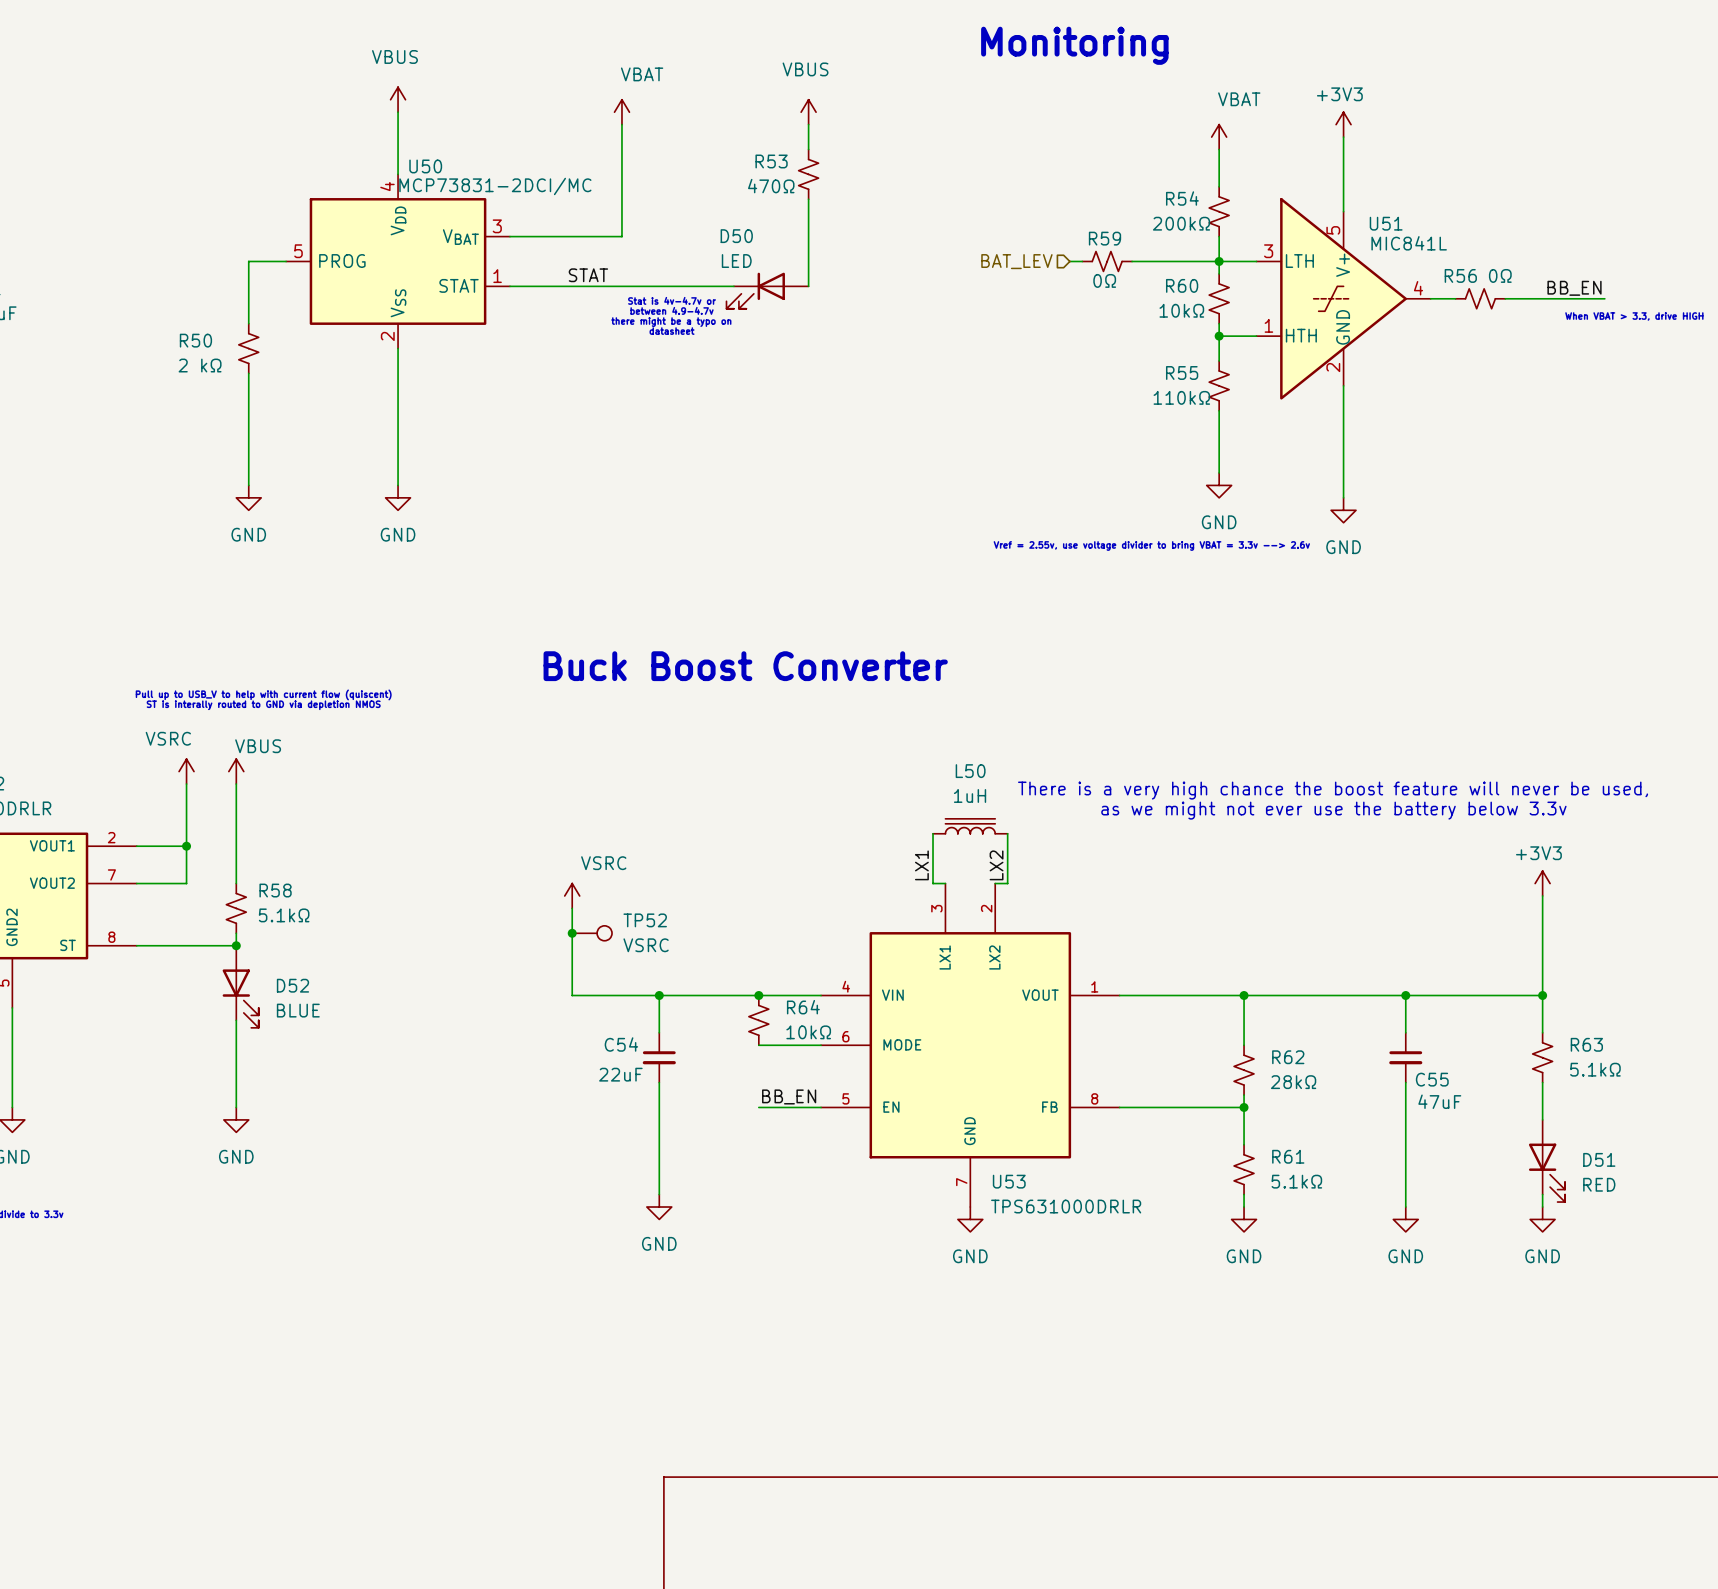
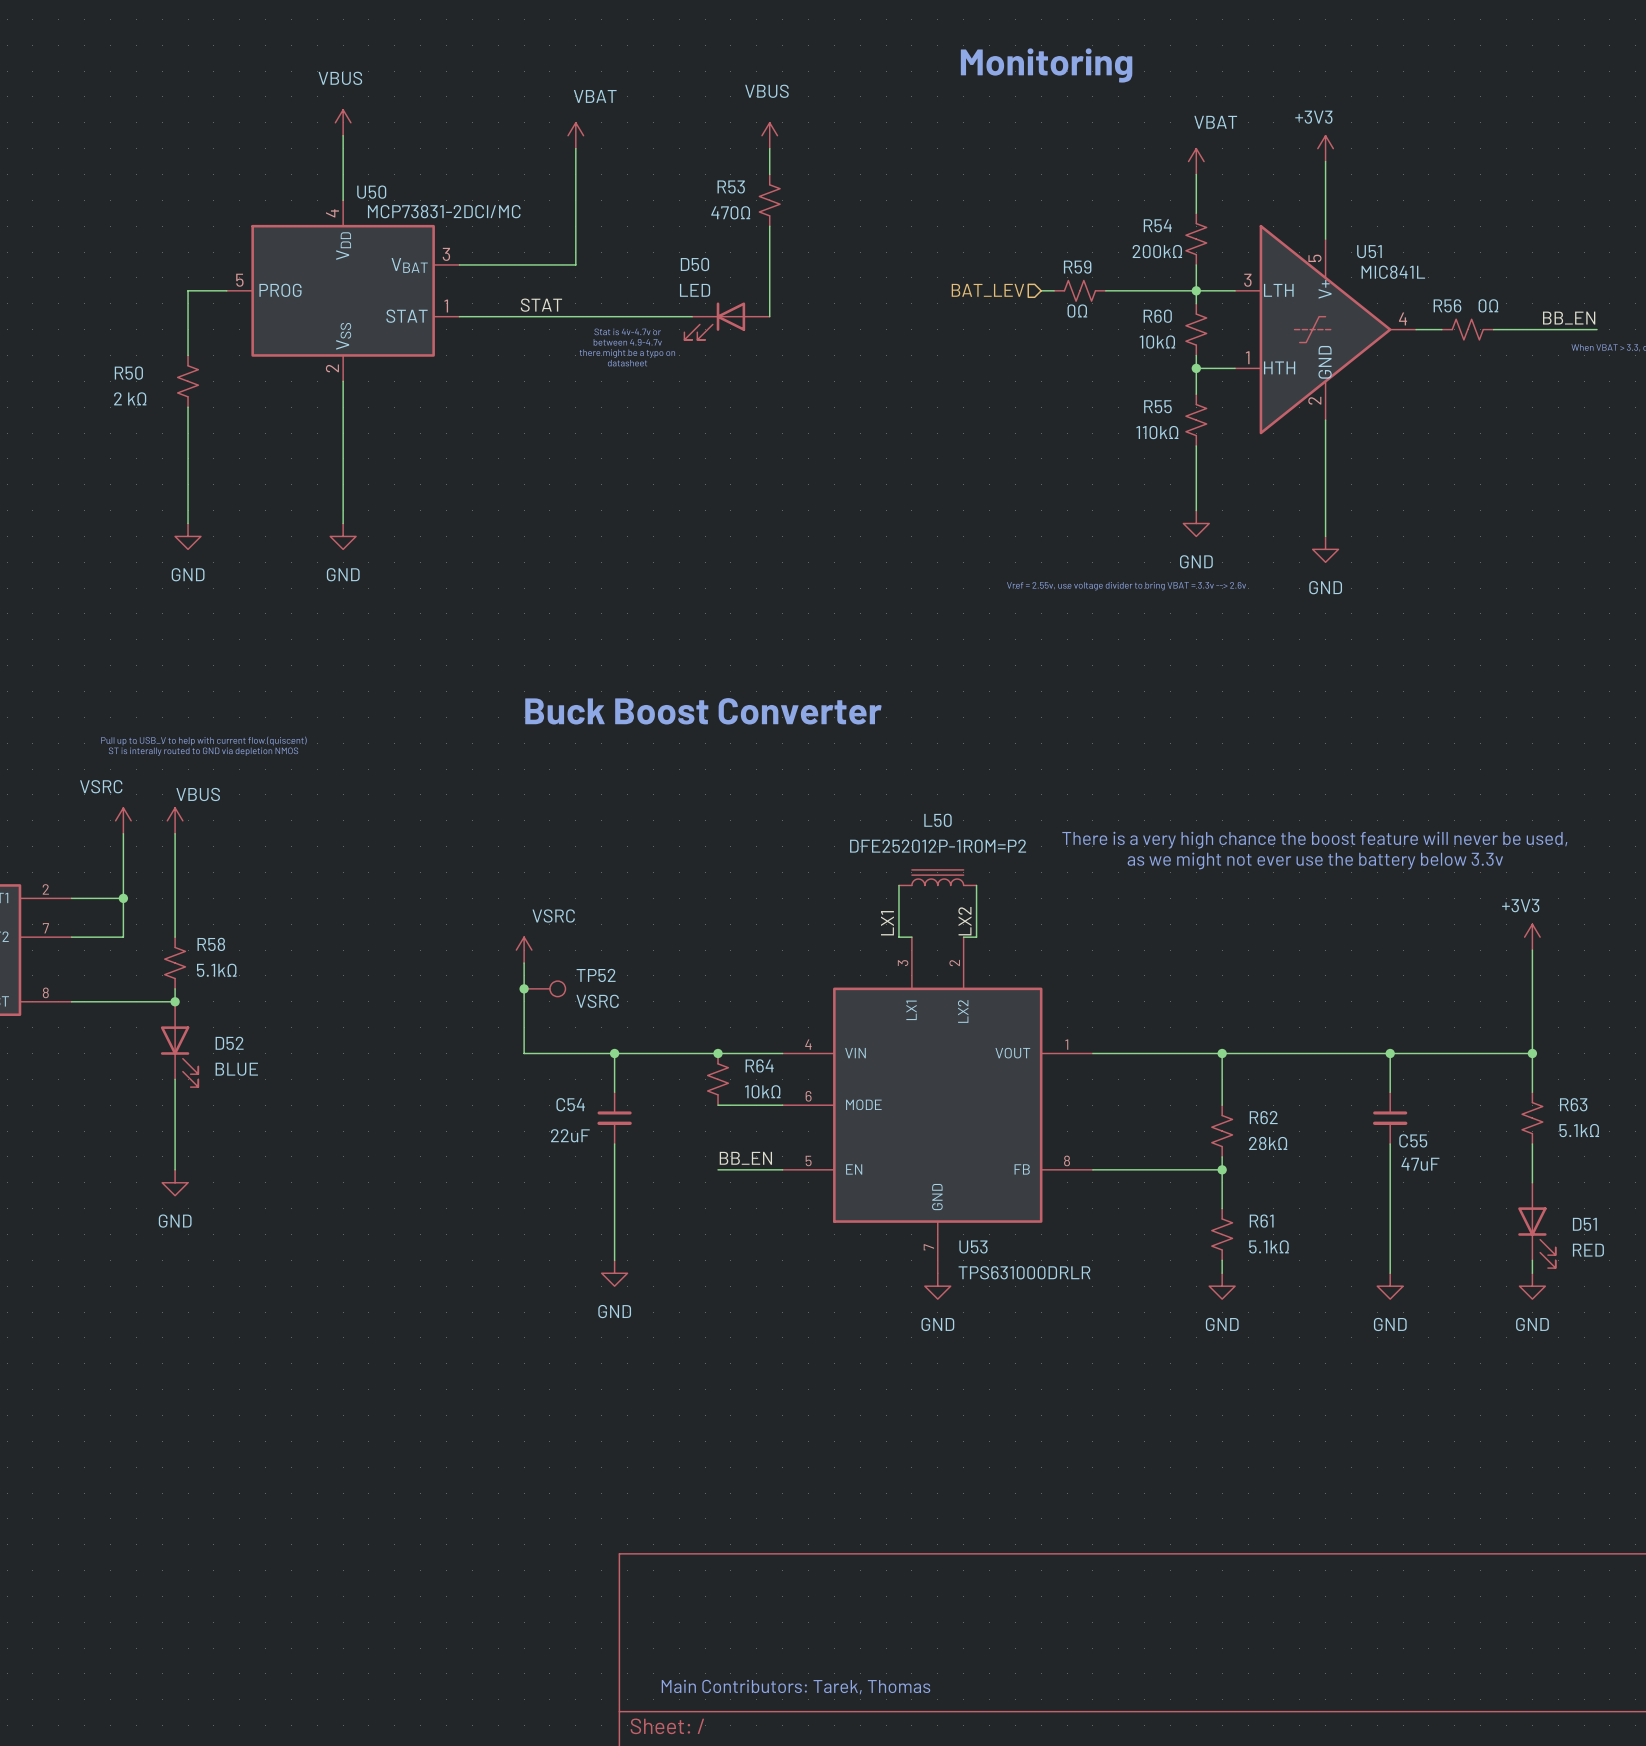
L50 value: 1uH (970, 795) -> DFE252012P-1R0M=P2 (938, 846)

